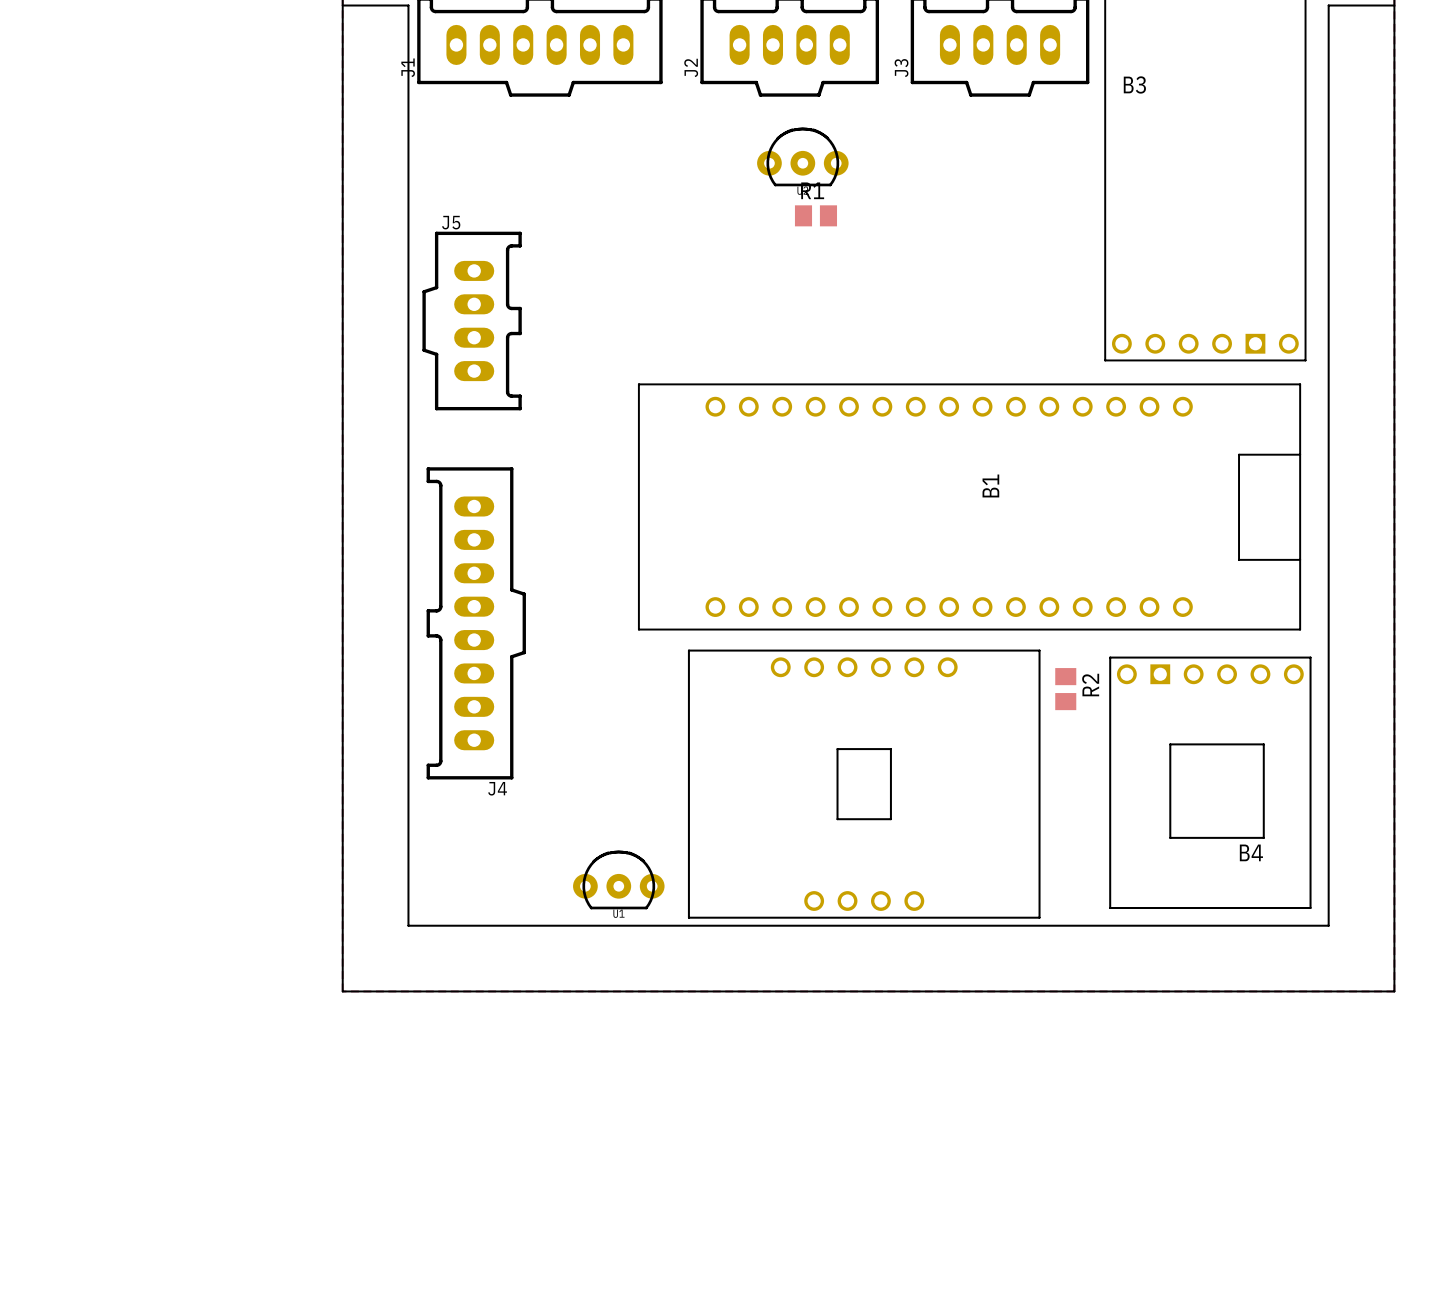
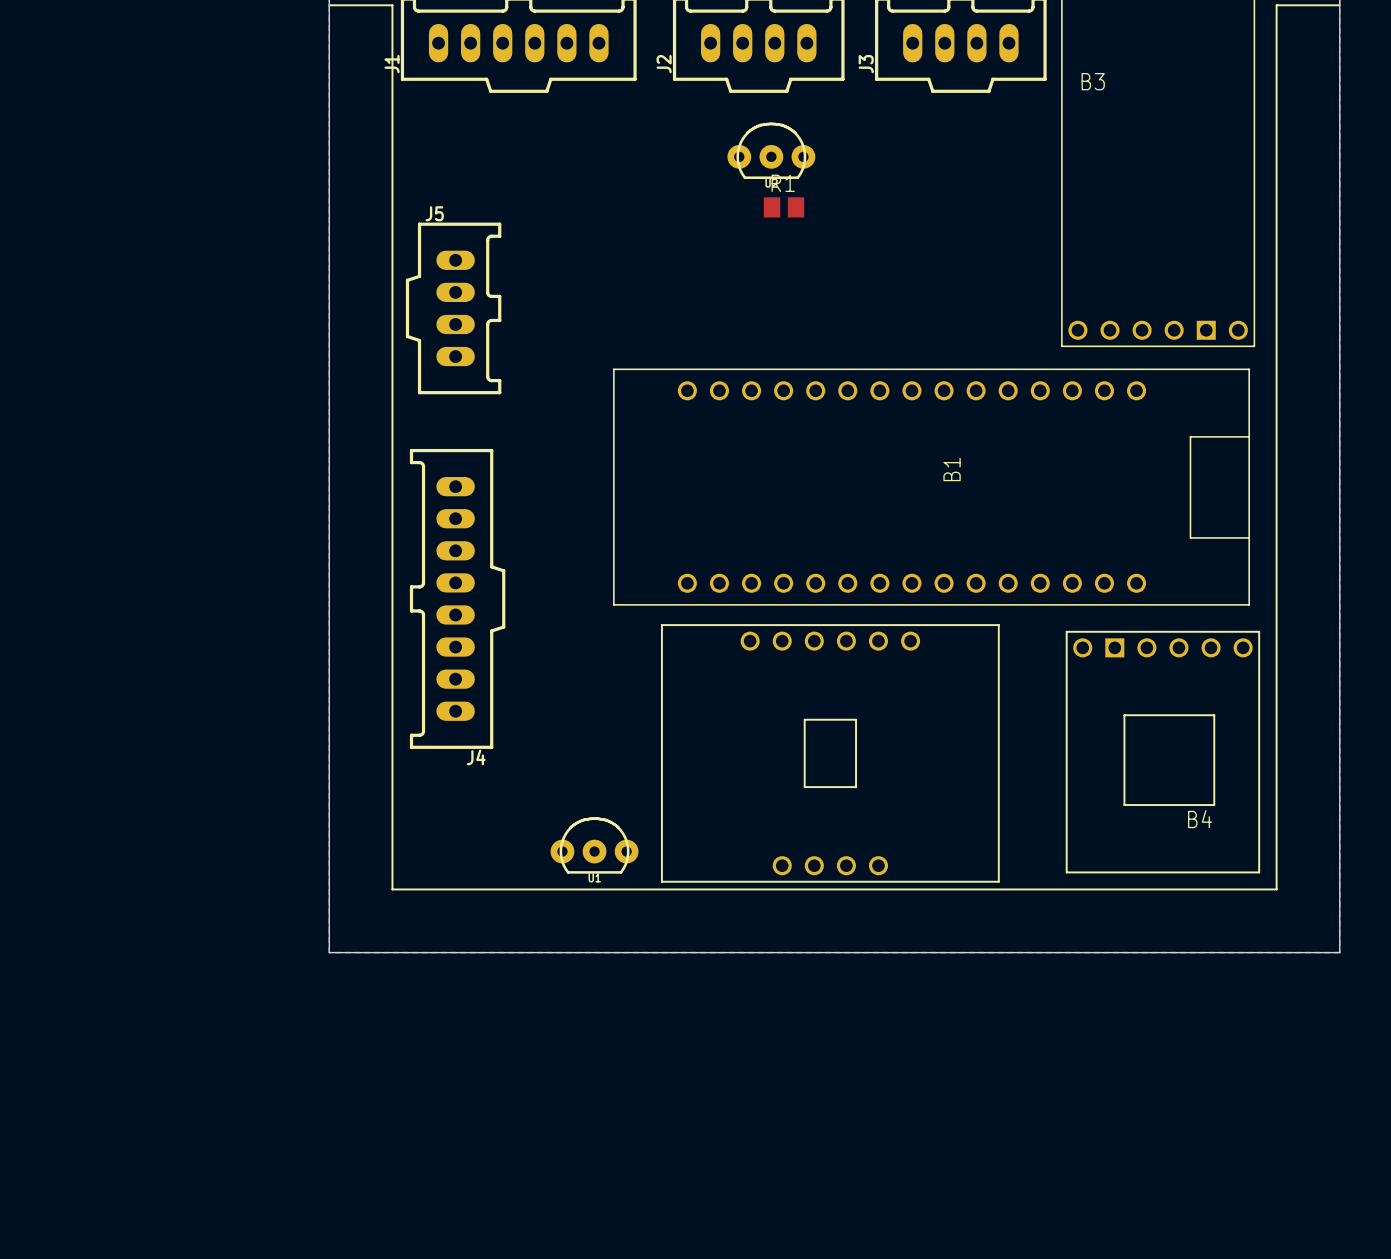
R2: (1065, 689) -> none

